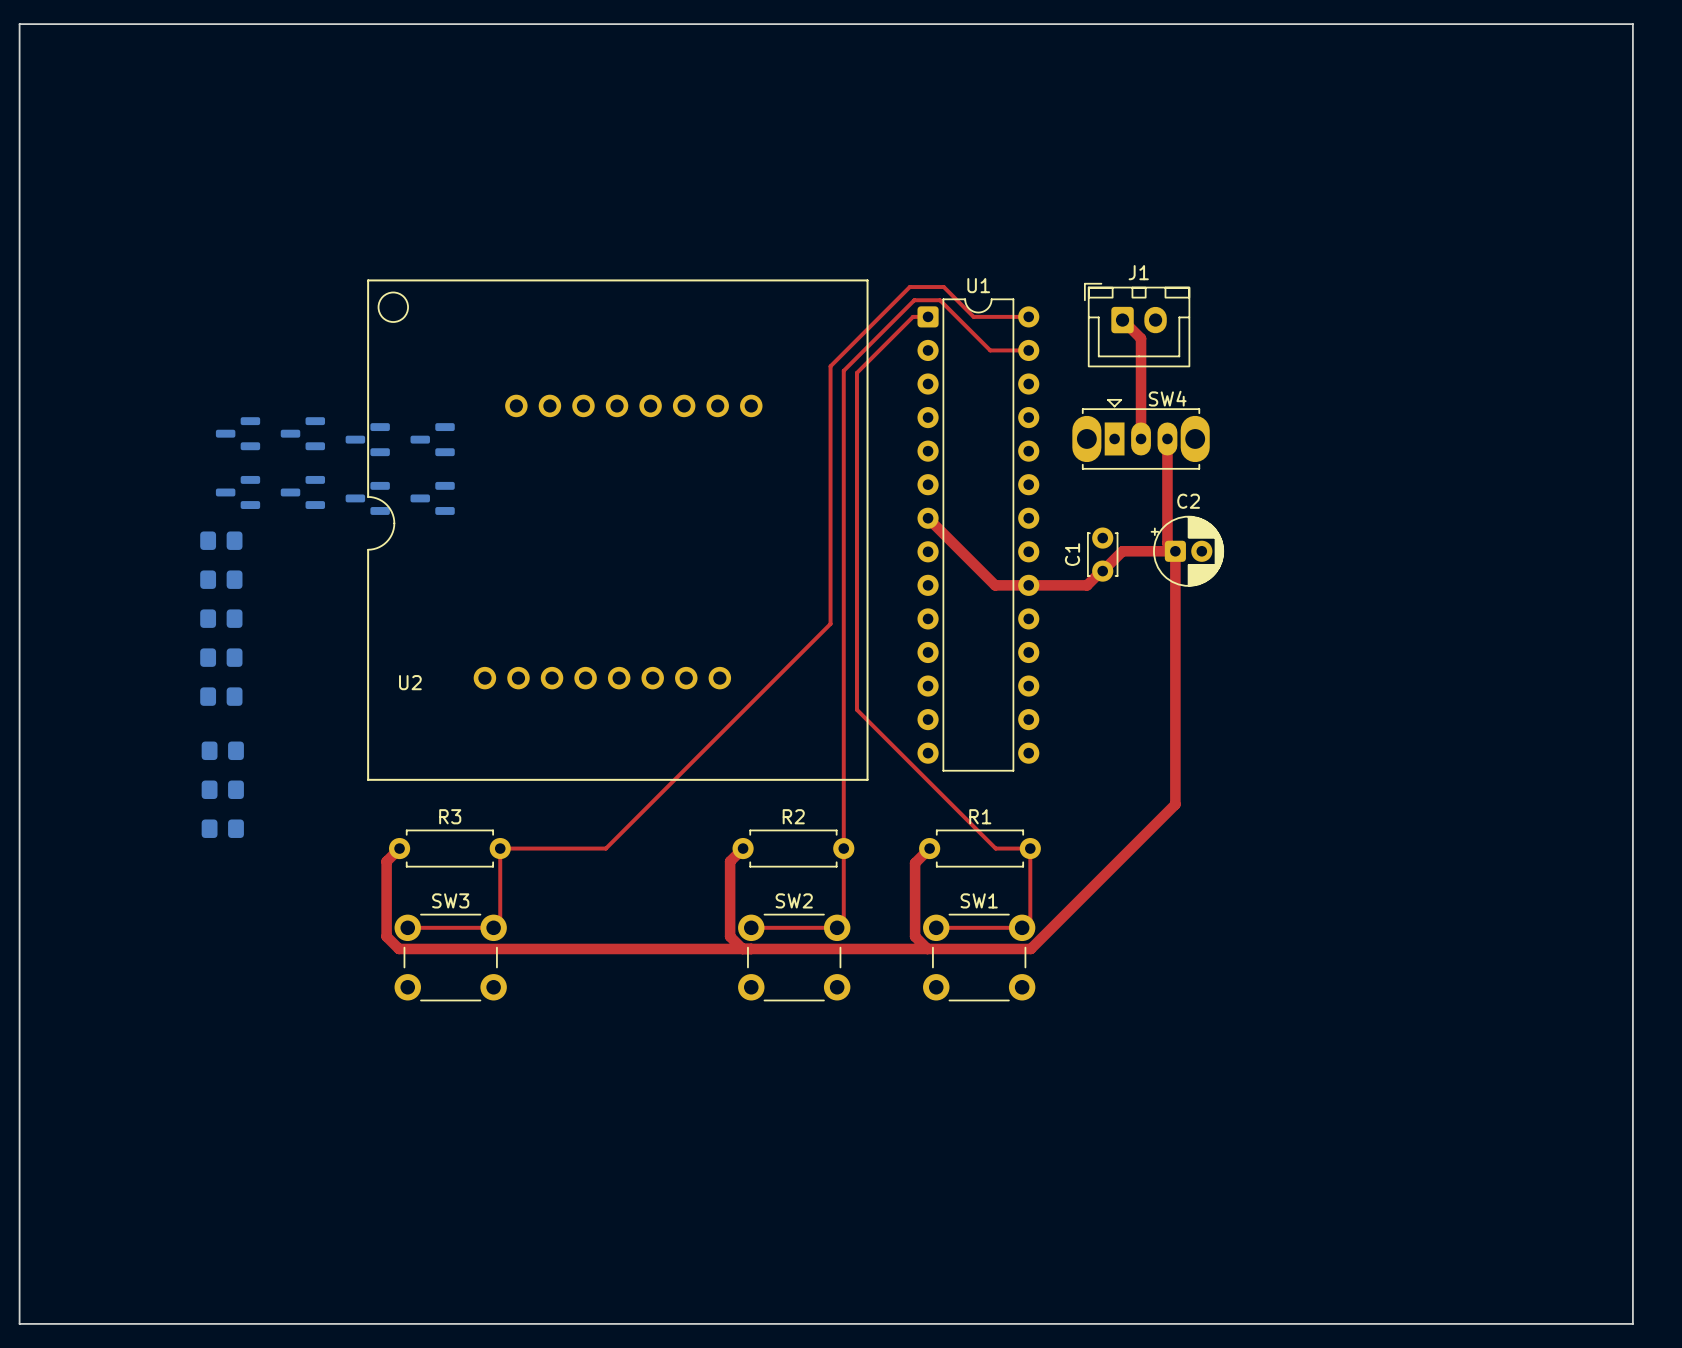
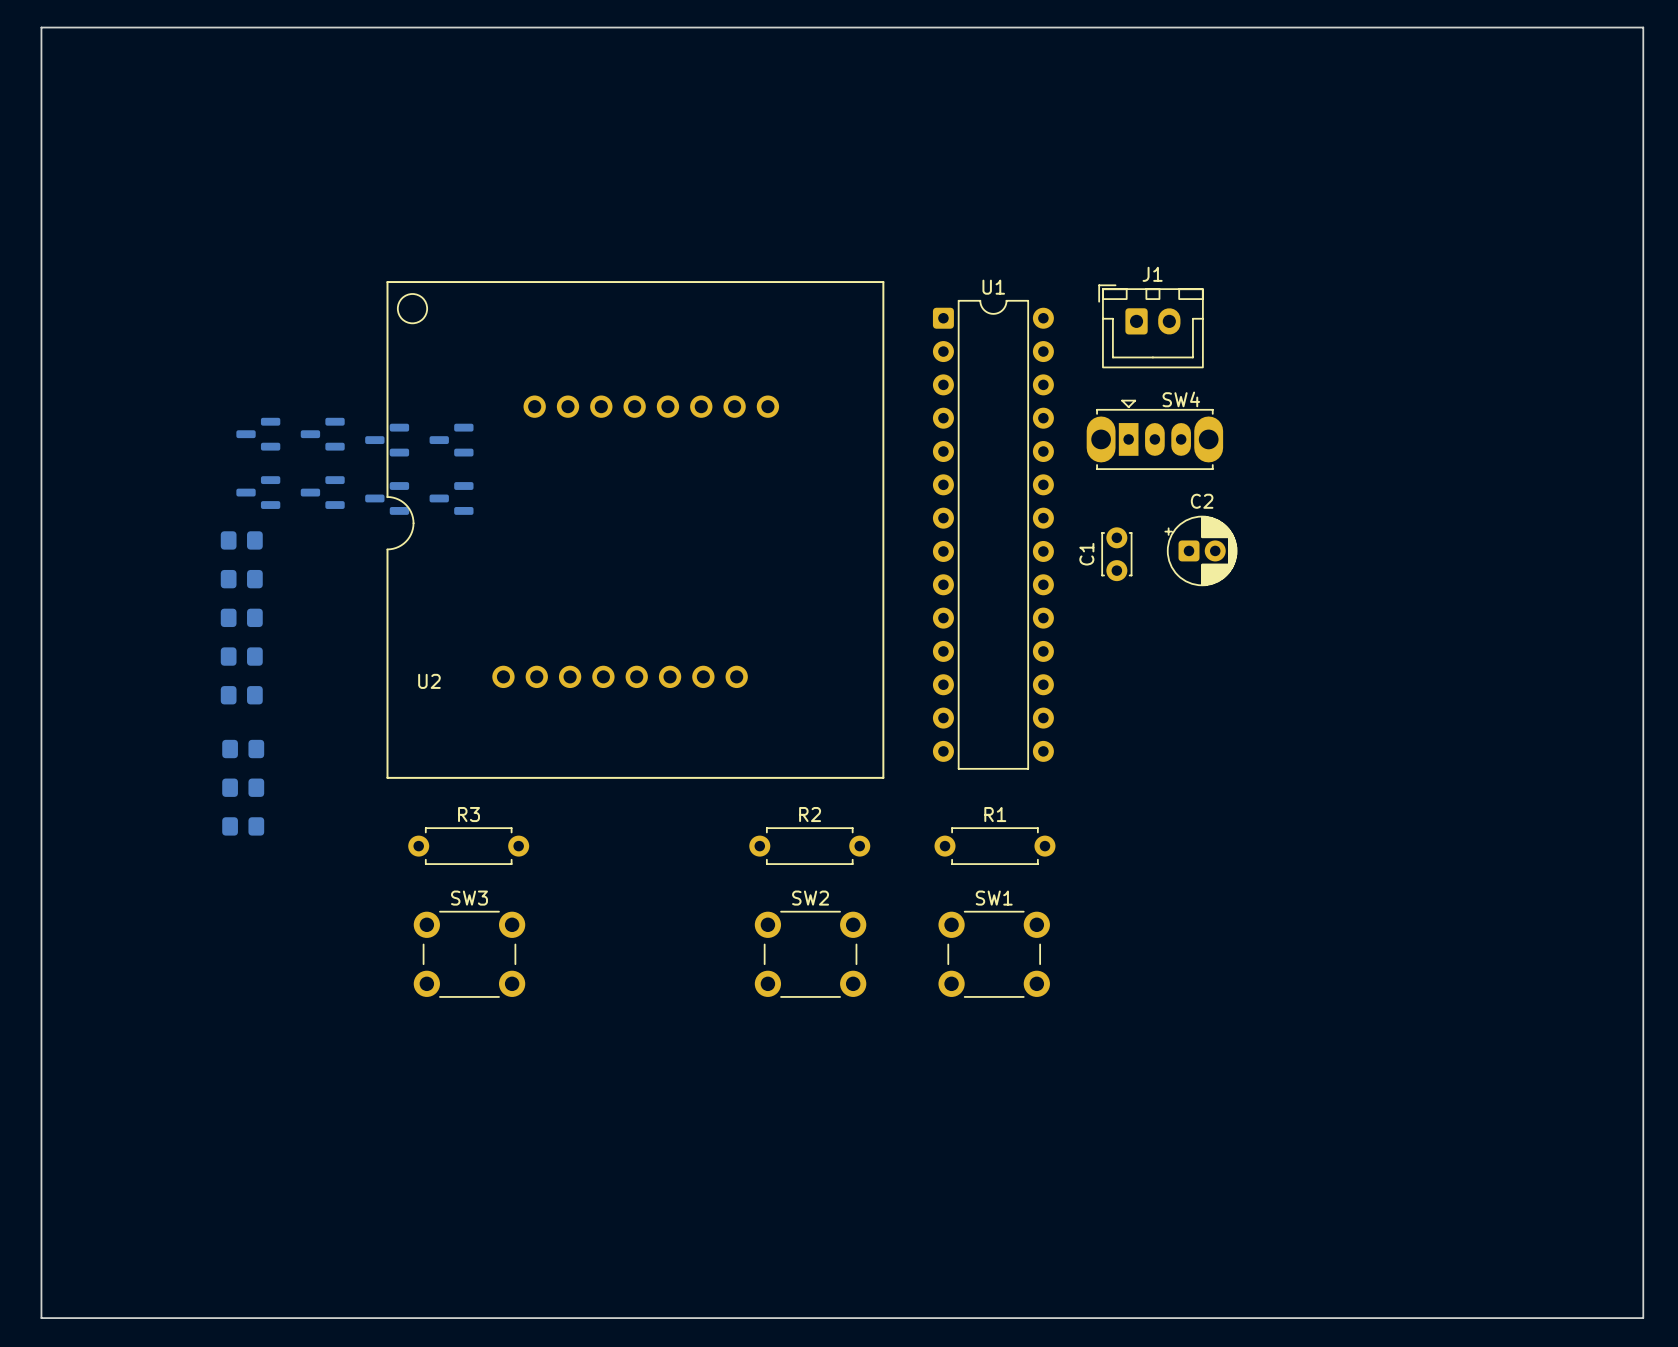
top track: (928, 316) (912, 316) (856, 372) (856, 709) (995, 848) (1030, 848) (1030, 919) (1022, 927) (936, 927) -> none
top track: (1028, 316) (973, 316) (943, 287) (909, 287) (830, 366) (830, 623) (605, 848) (500, 848) (500, 921) (493, 927) (407, 927) -> none
top track: (1122, 320) (1141, 338) (1141, 438) -> none
top track: (1028, 350) (990, 350) (940, 300) (914, 300) (843, 370) (843, 921) (837, 927) (751, 927) -> none
top track: (1167, 438) (1167, 543) (1175, 551) -> none
top track: (928, 518) (995, 585) (1087, 585) (1122, 551) (1175, 551) -> none
top track: (1175, 551) (1175, 804) (1030, 948) (399, 948) (386, 936) (386, 861) (399, 848) -> none
top track: (743, 848) (730, 861) (730, 936) (742, 948) -> none
top track: (929, 848) (915, 863) (915, 936) (927, 948) -> none

